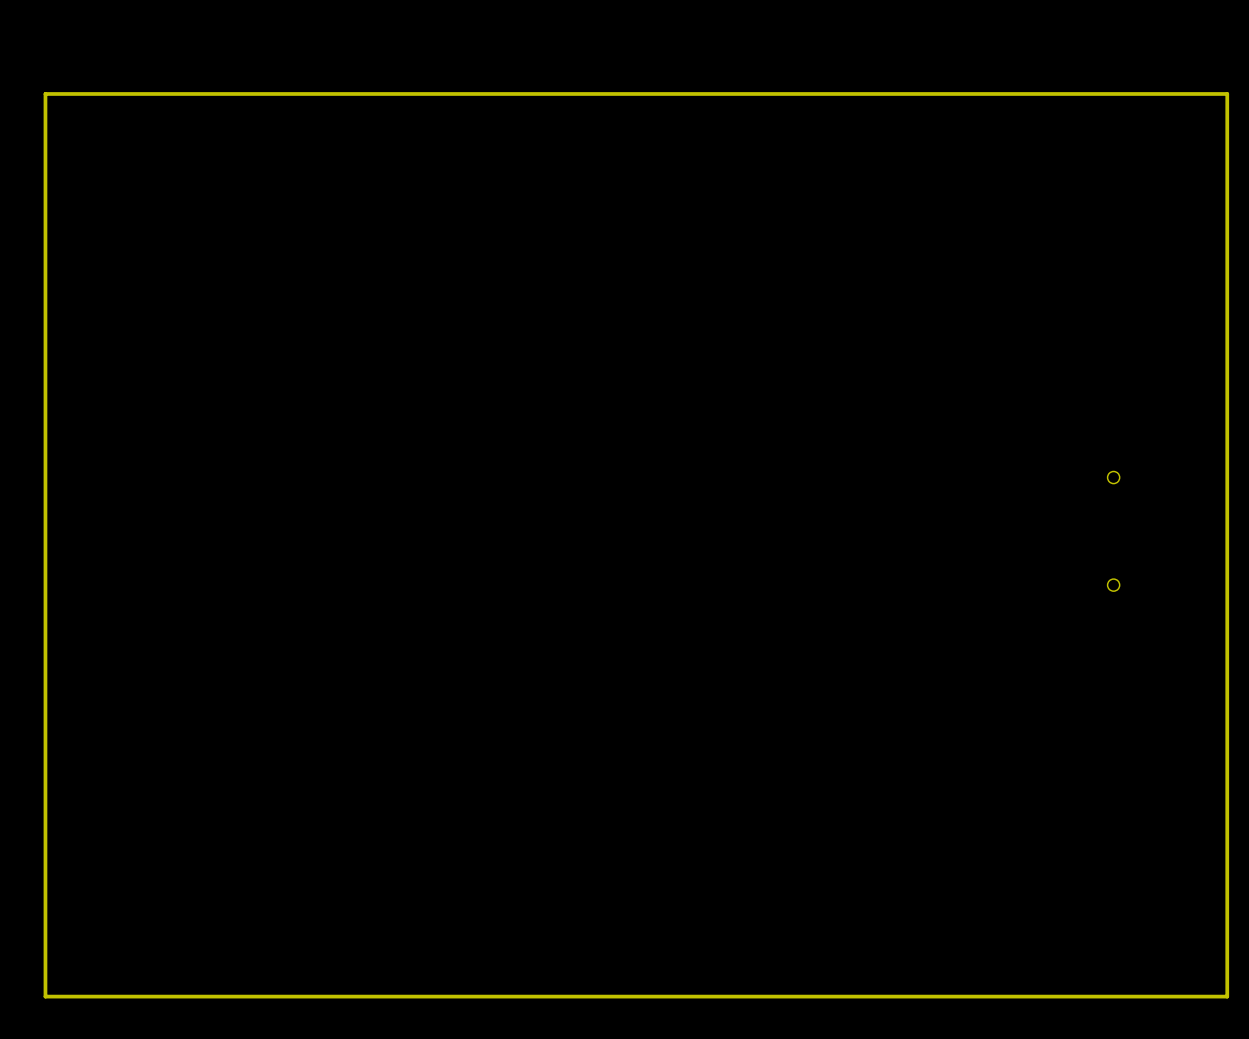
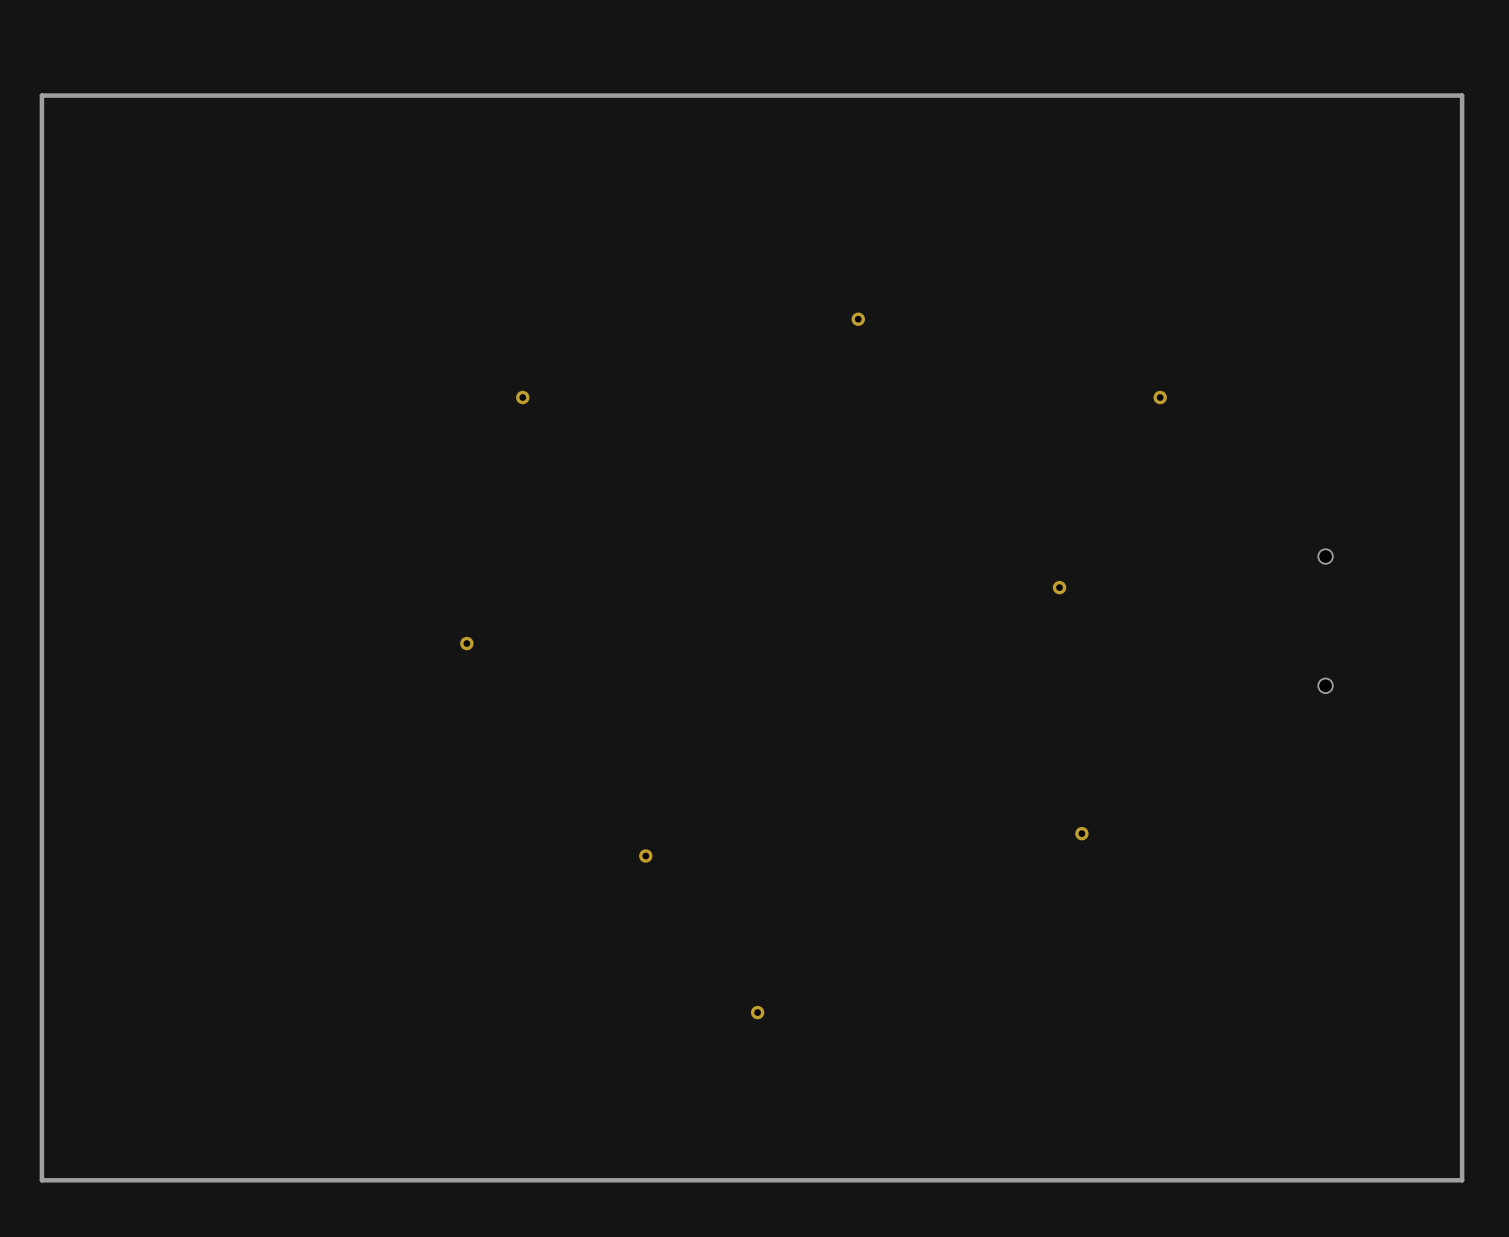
via: none -> (858, 319)
via: none -> (522, 397)
via: none -> (1160, 397)
via: none -> (1059, 587)
via: none -> (466, 643)
via: none -> (1081, 833)
via: none -> (645, 856)
via: none -> (757, 1012)

